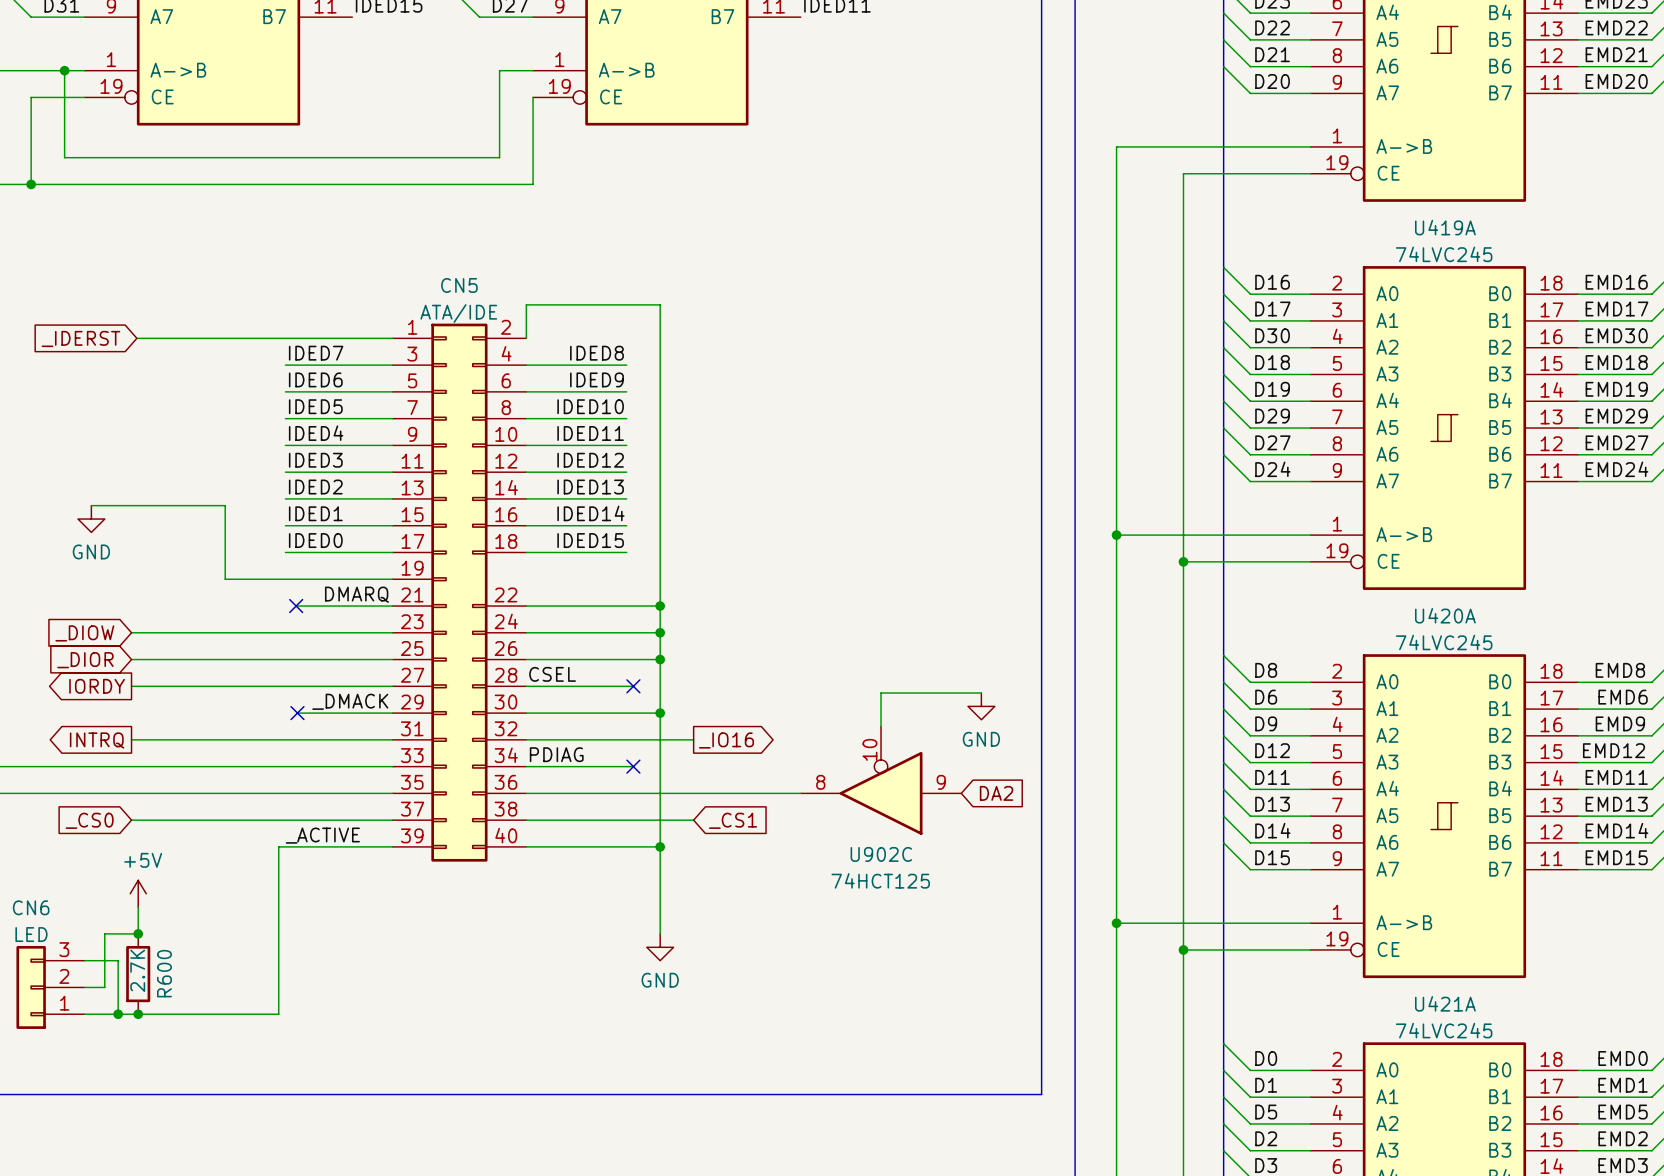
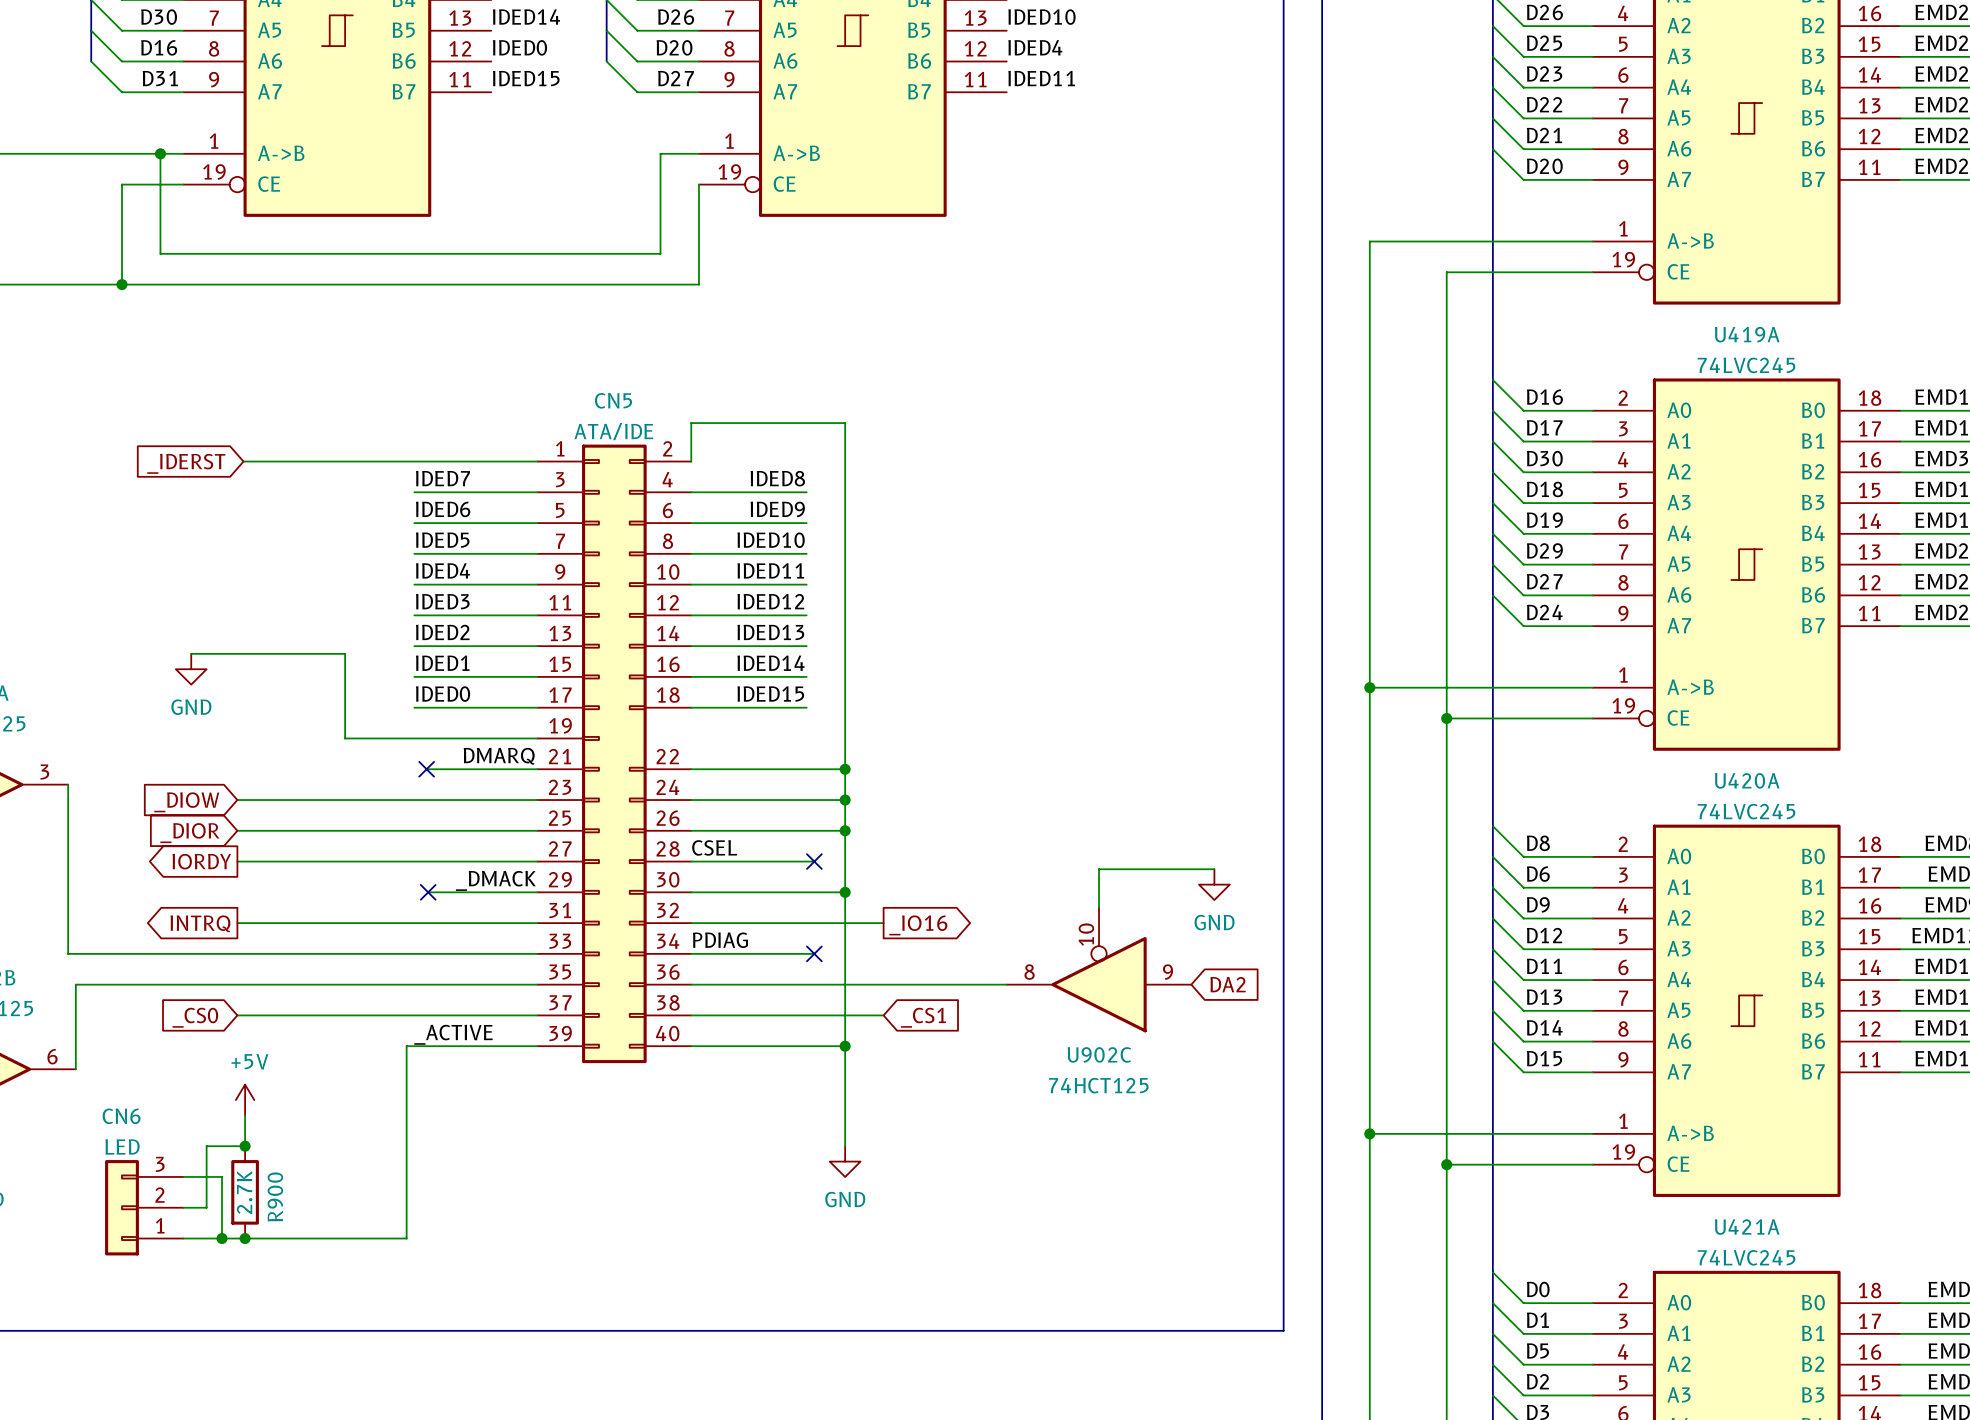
R600 name: R600 (164, 973) -> R900 (275, 1196)

